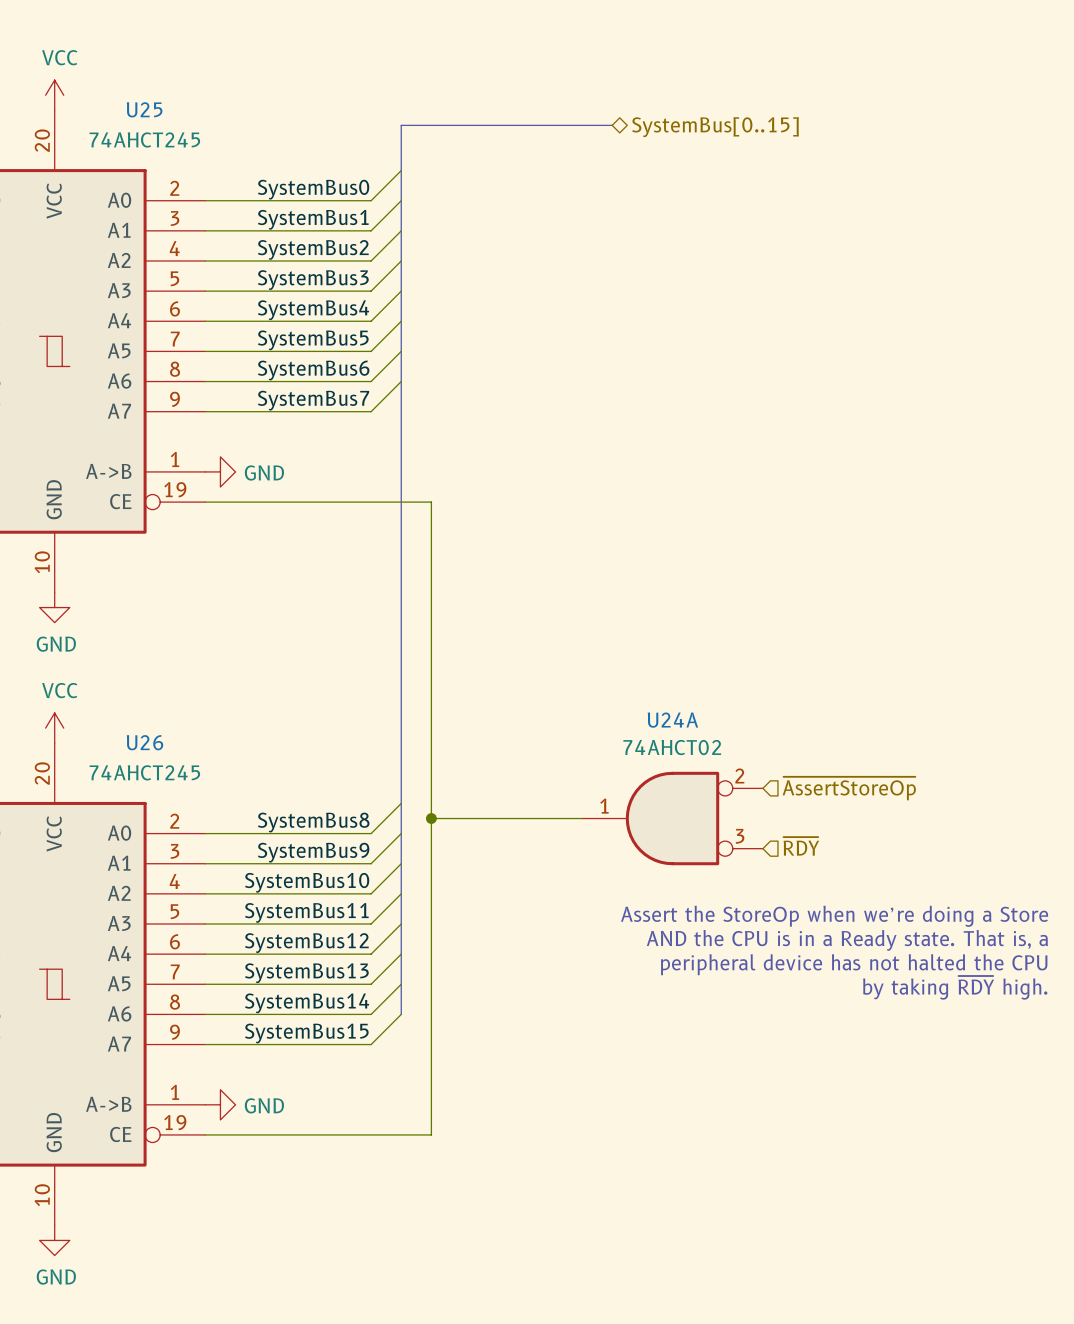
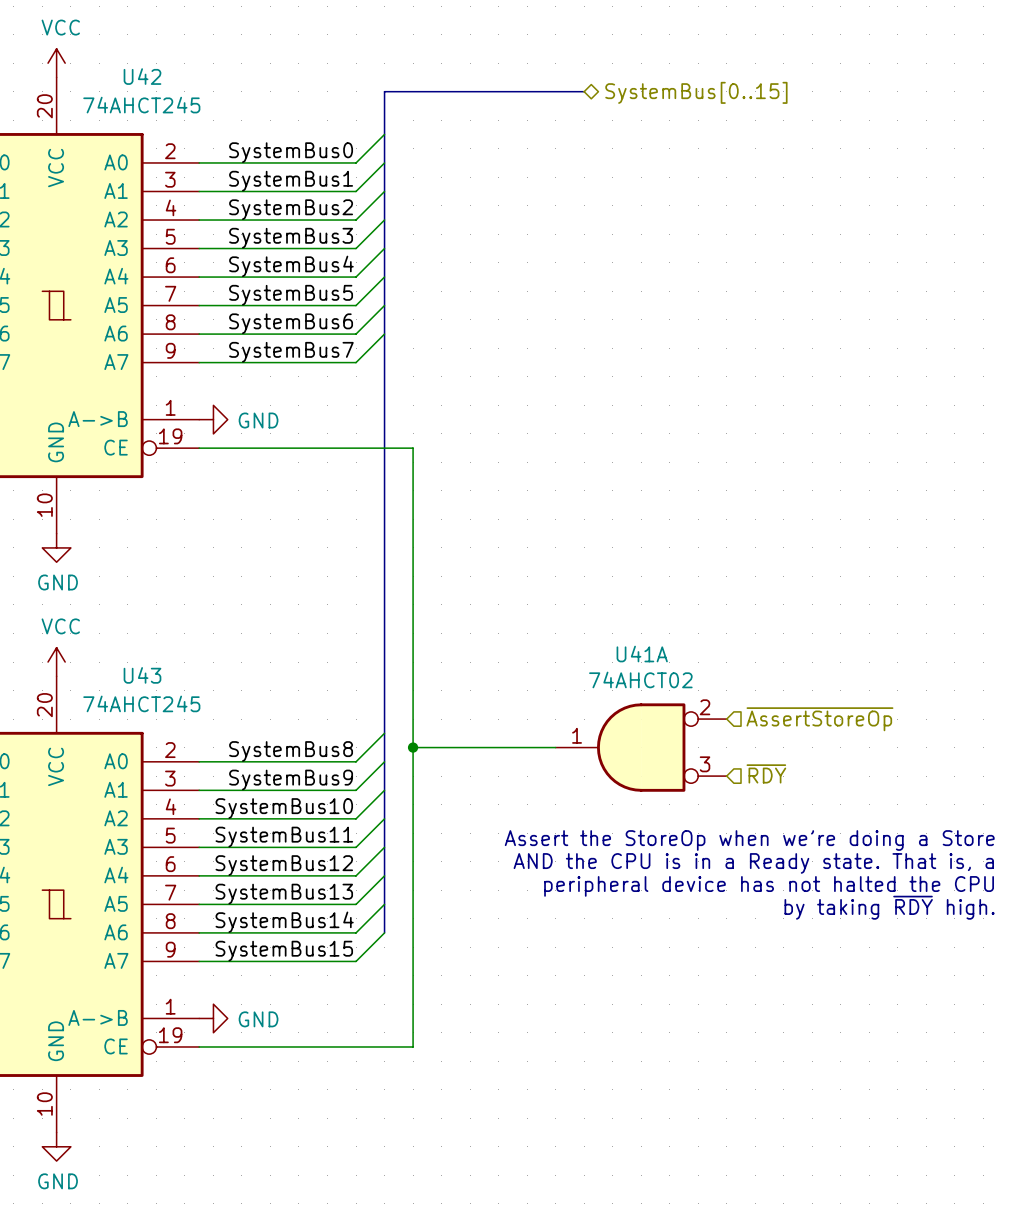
U25 name: U25 (144, 109) -> U42 (142, 76)
U24A name: U24A (672, 720) -> U41A (642, 654)
U26 name: U26 (144, 742) -> U43 (142, 675)

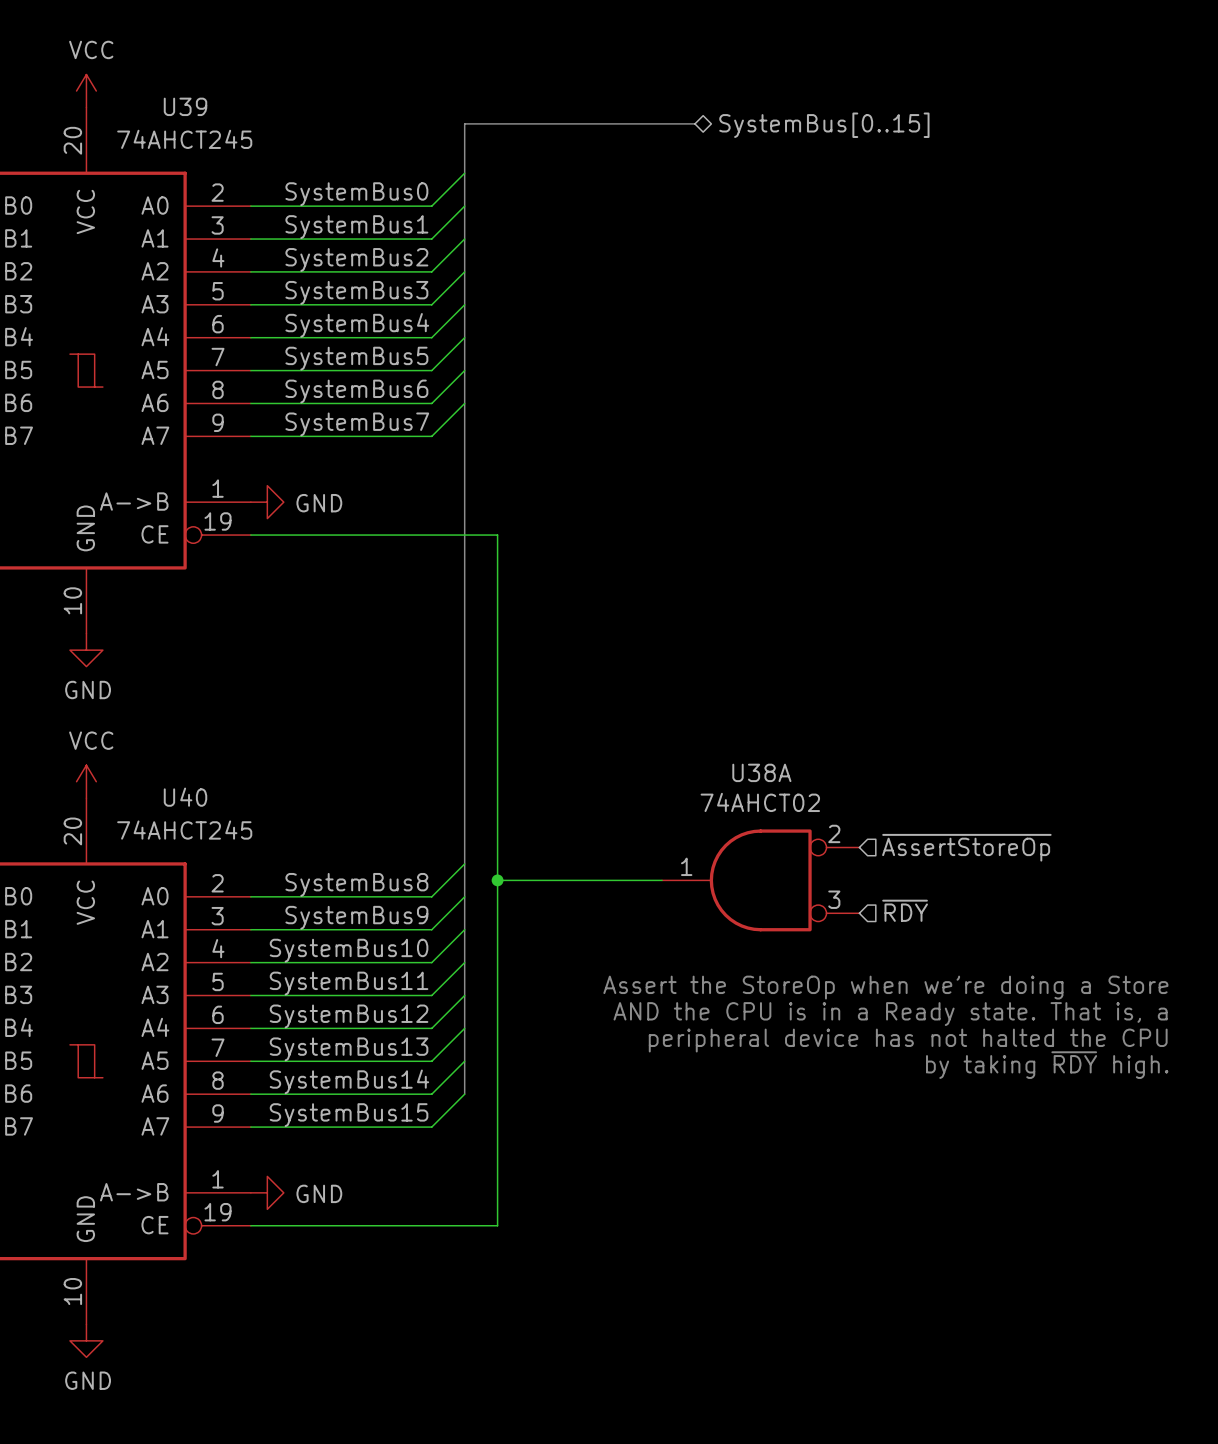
U42 name: U42 (142, 76) -> U39 (185, 106)
U41A name: U41A (642, 654) -> U38A (761, 772)
U43 name: U43 (142, 675) -> U40 (185, 797)

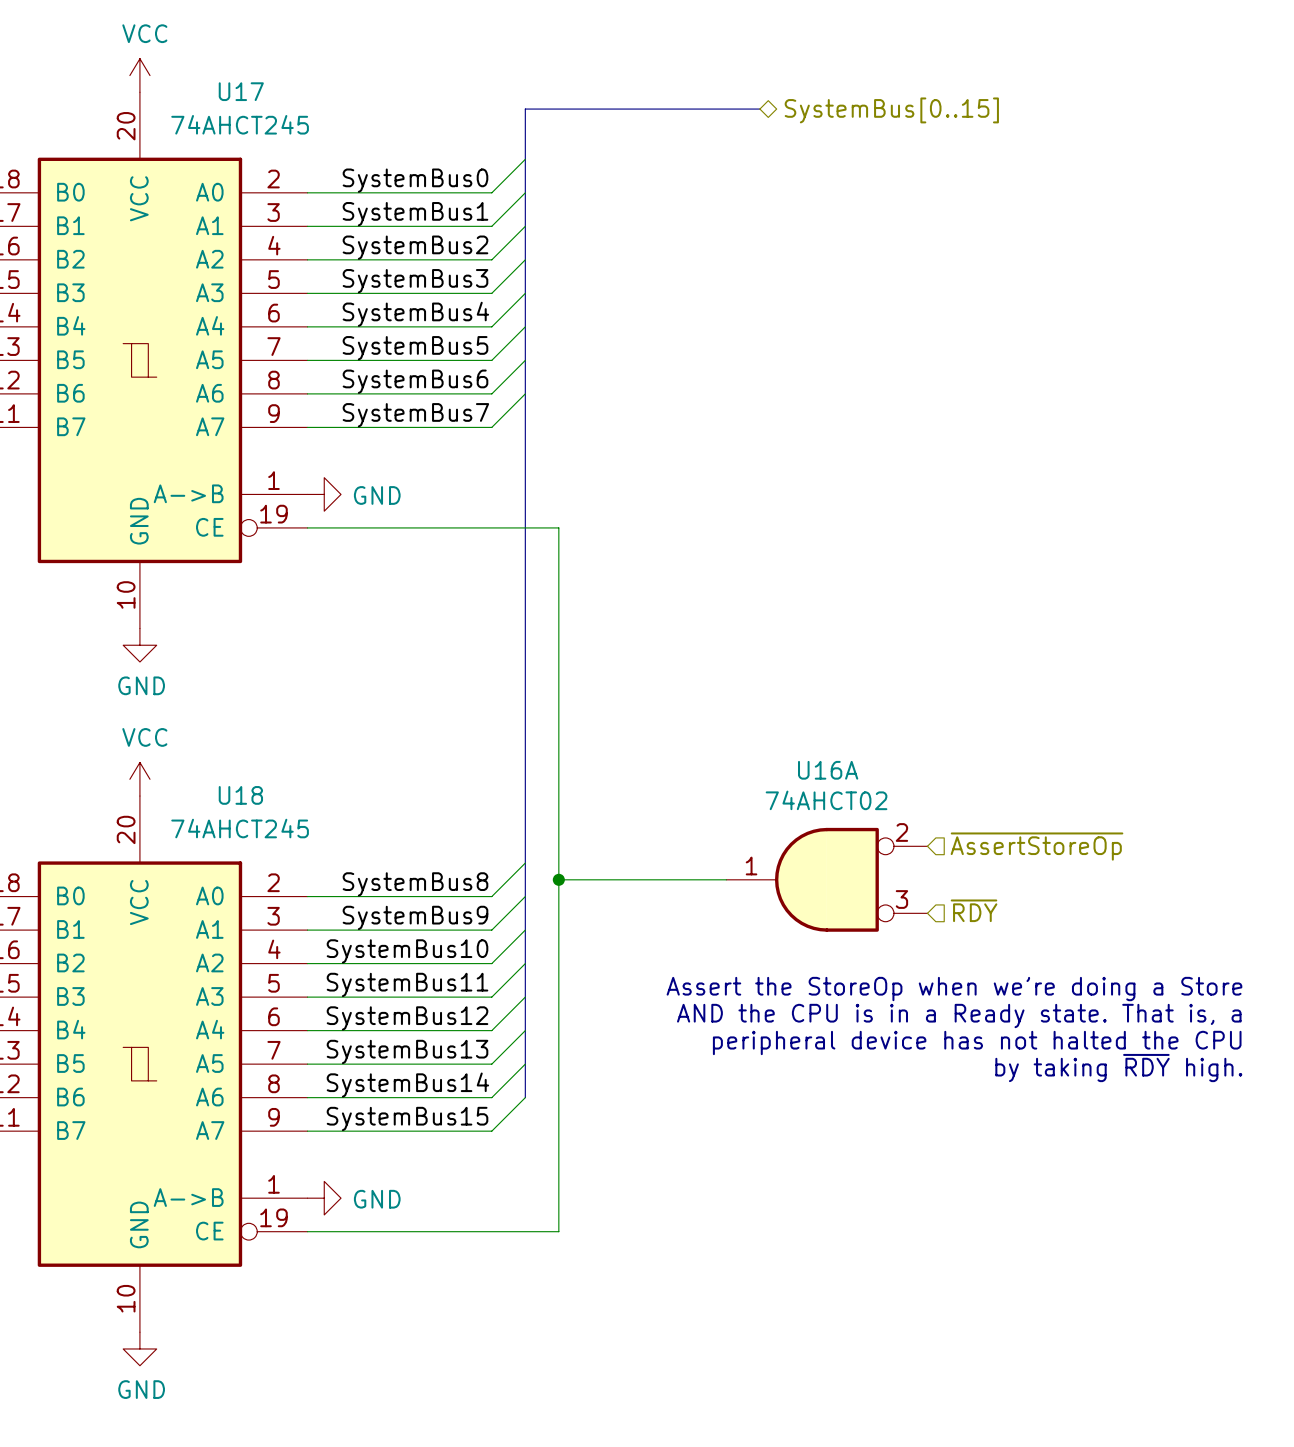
U39 name: U39 (185, 106) -> U17 (241, 91)
U38A name: U38A (761, 772) -> U16A (828, 770)
U40 name: U40 (185, 797) -> U18 (240, 795)

